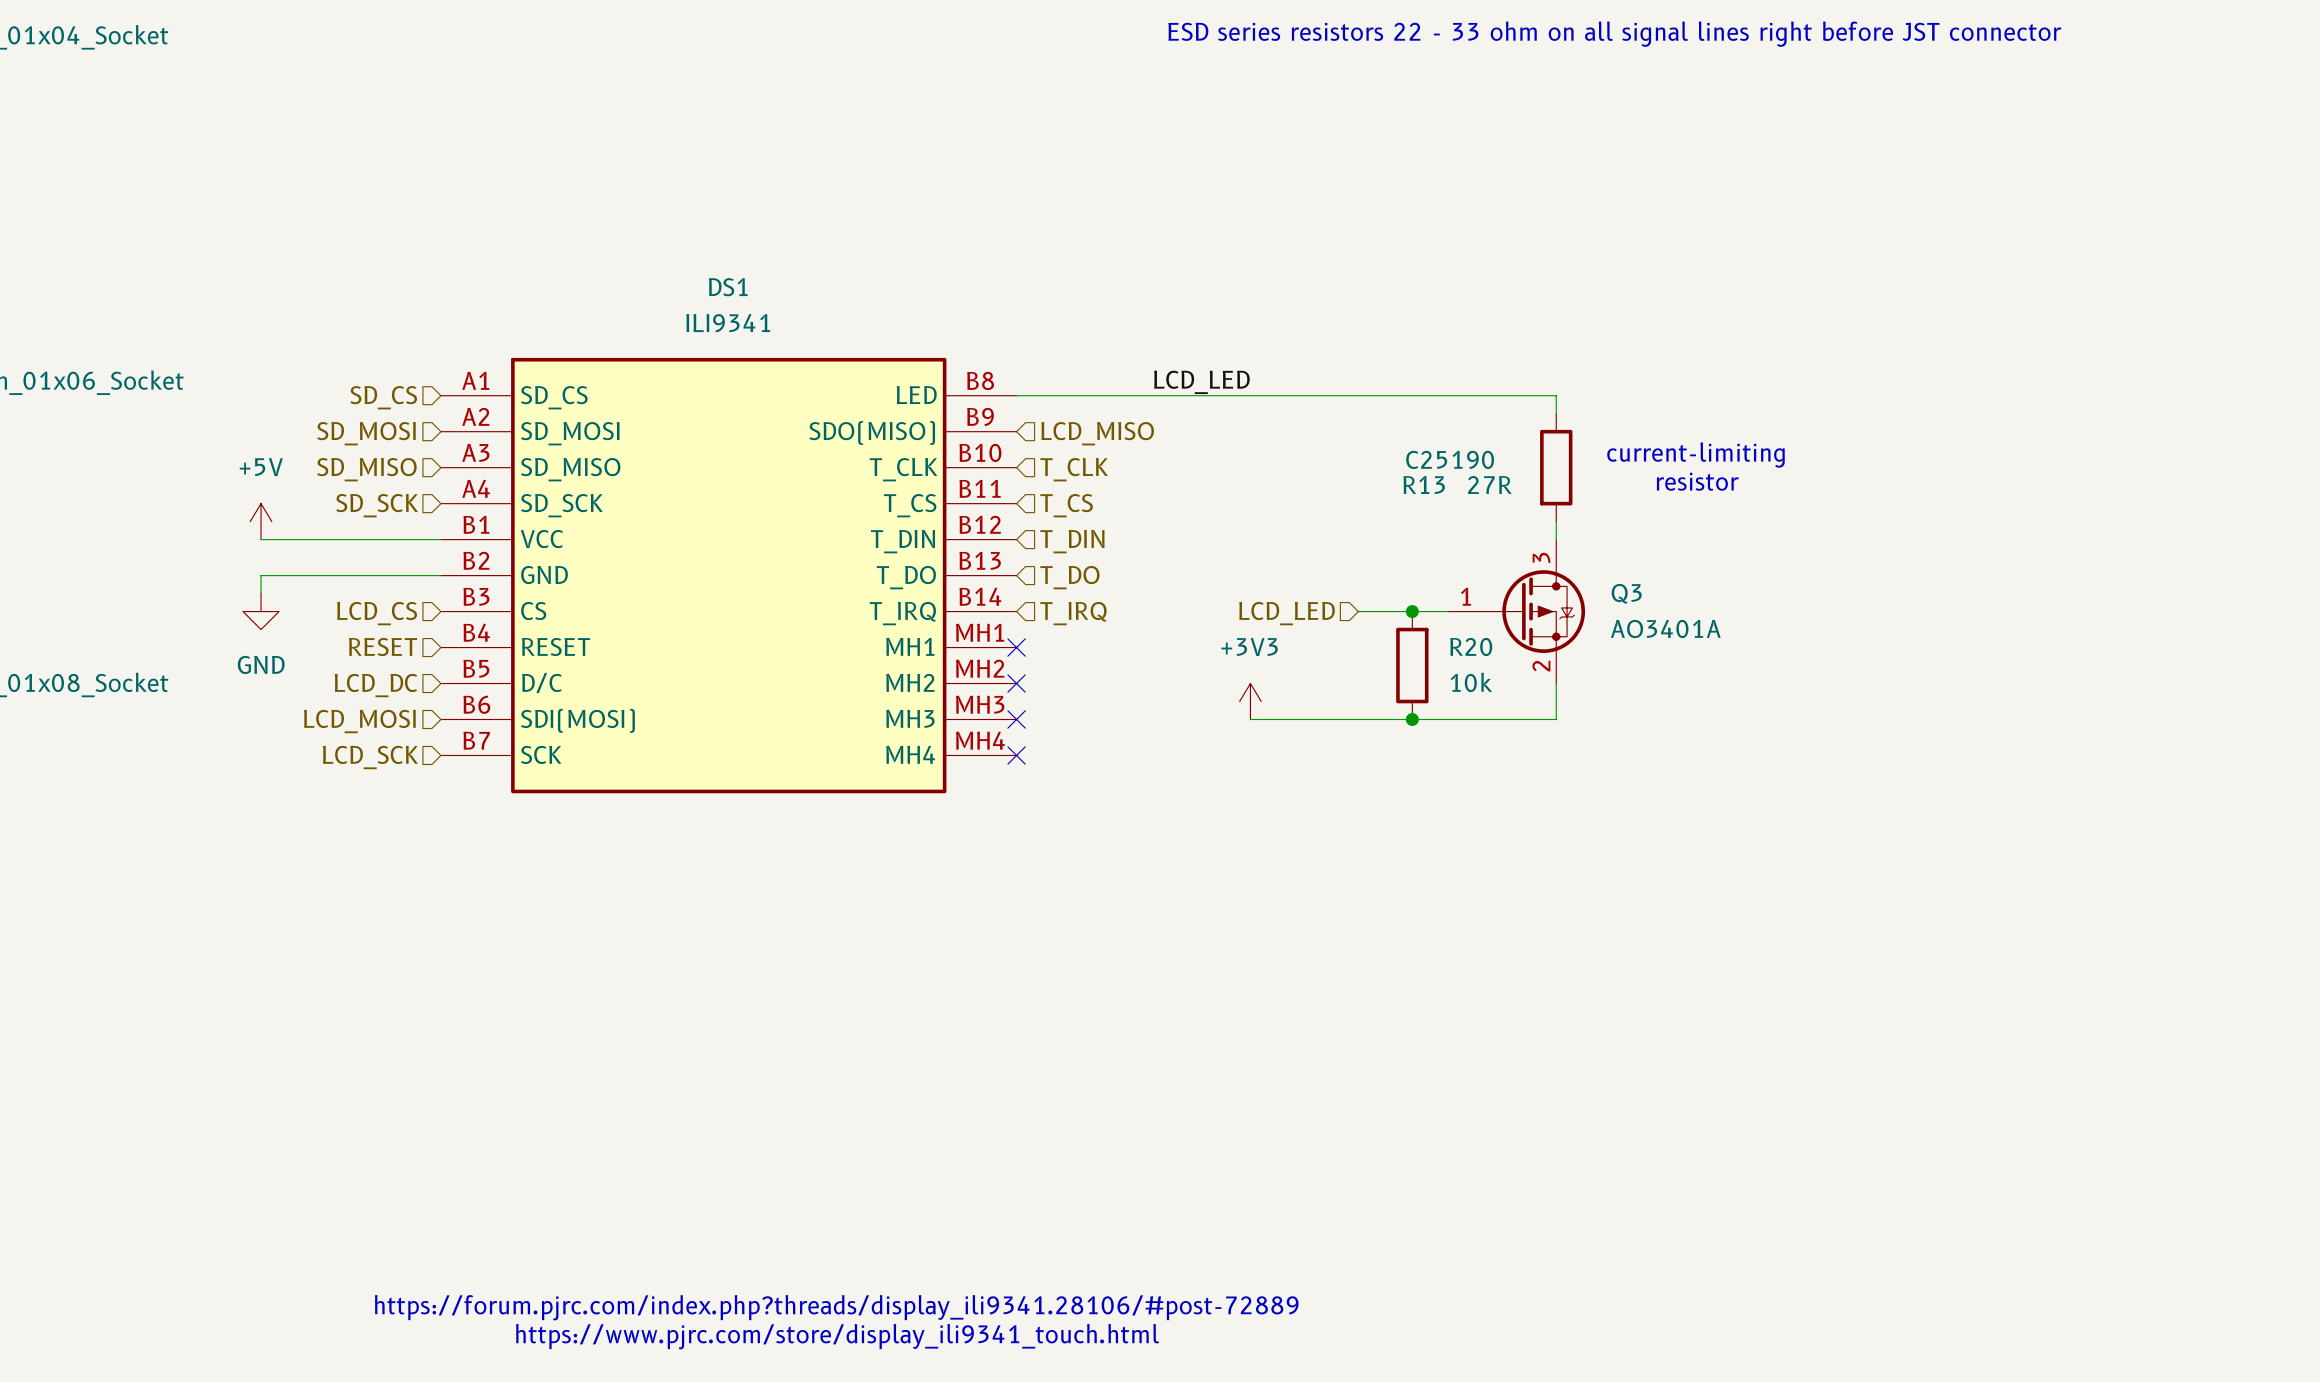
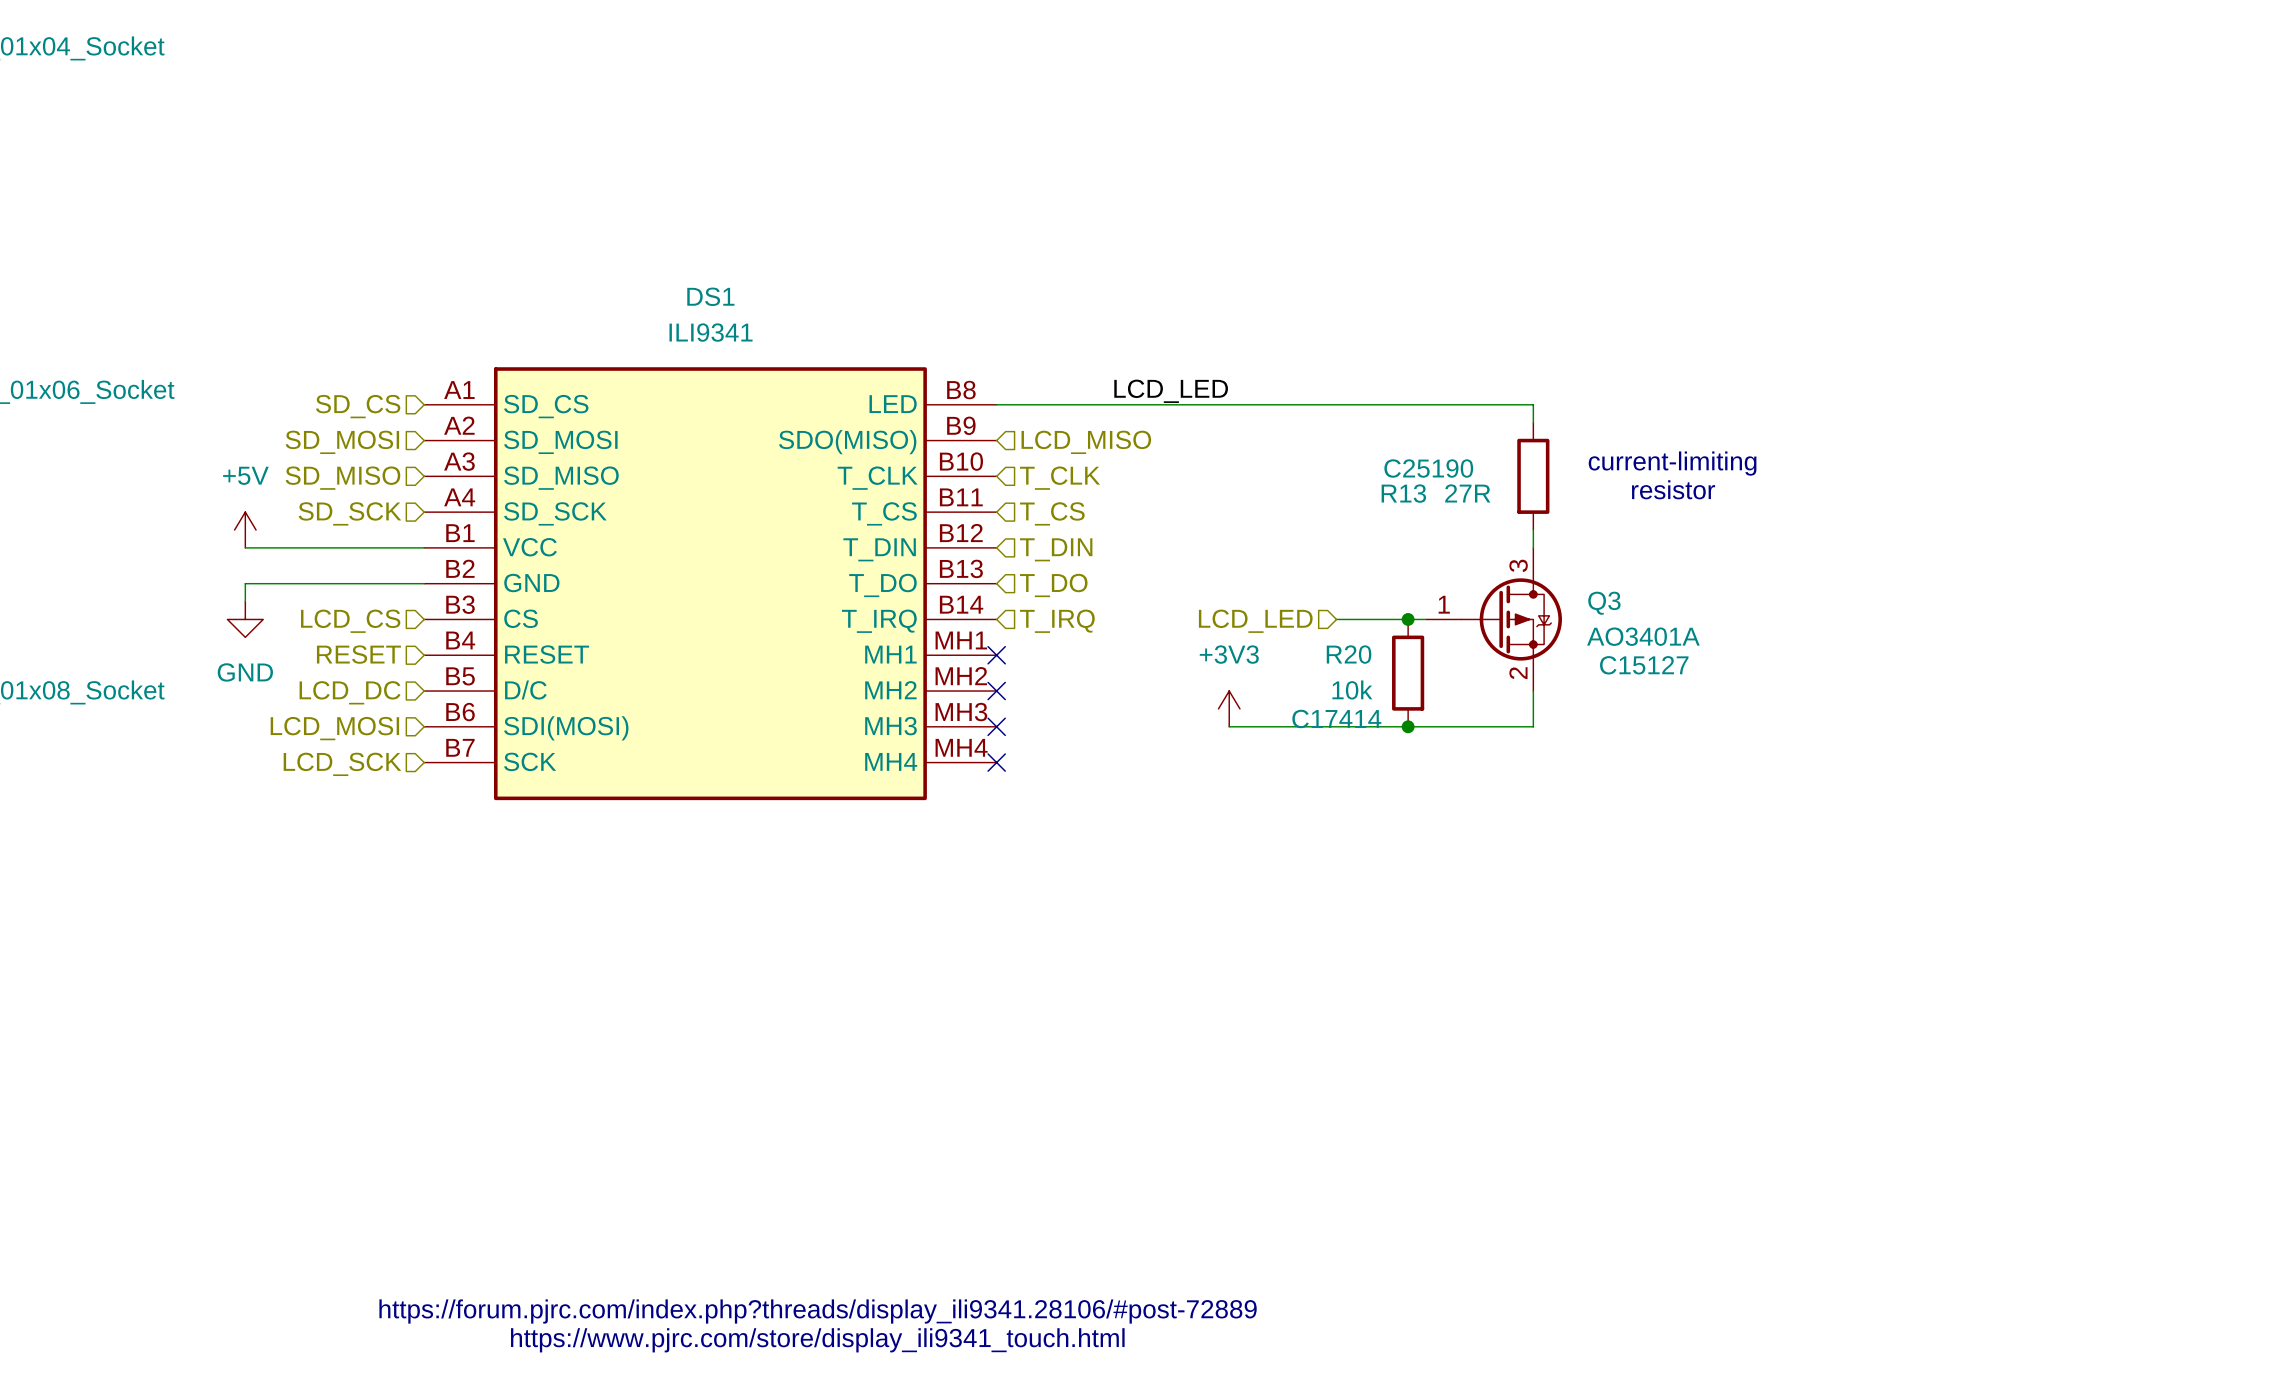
text: ESD series resistors 22 - 33 ohm on all signal lines right before JST connector (1614, 34) -> none
junction position: (1412, 611) -> (1408, 619)
R20 name position: R20 (1471, 646) -> R20 (1349, 654)
Q3 text: none -> C15127 (1644, 665)
R20 position: (1412, 665) -> (1408, 673)
R20 value position: 10k (1471, 682) -> 10k (1352, 690)
R20 text: none -> C17414 (1336, 718)
junction position: (1412, 719) -> (1408, 726)

